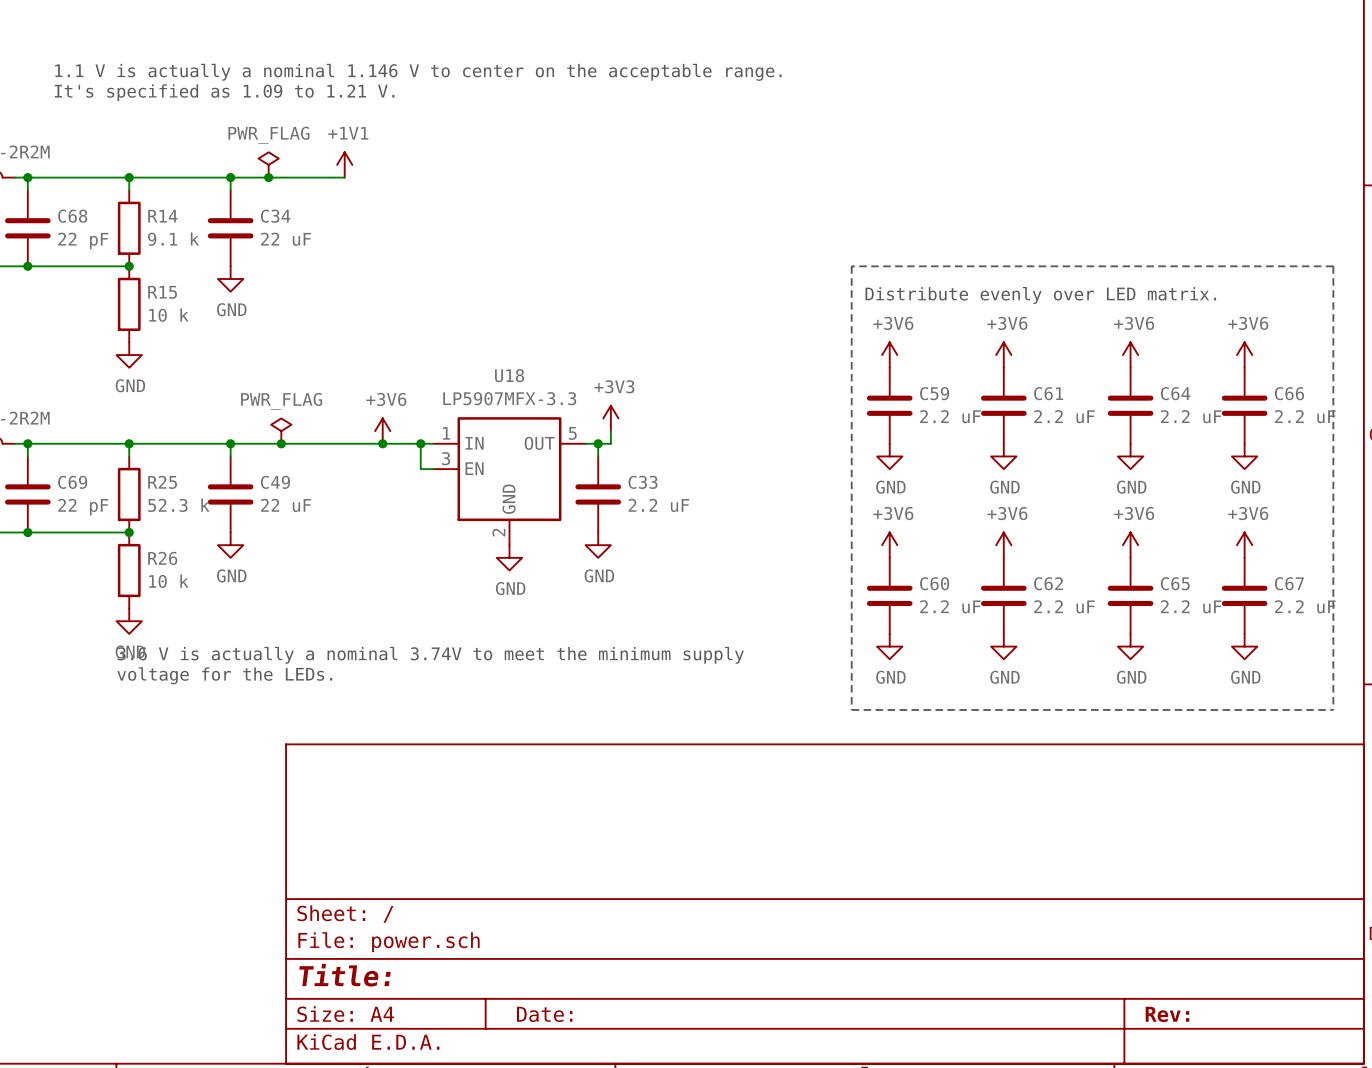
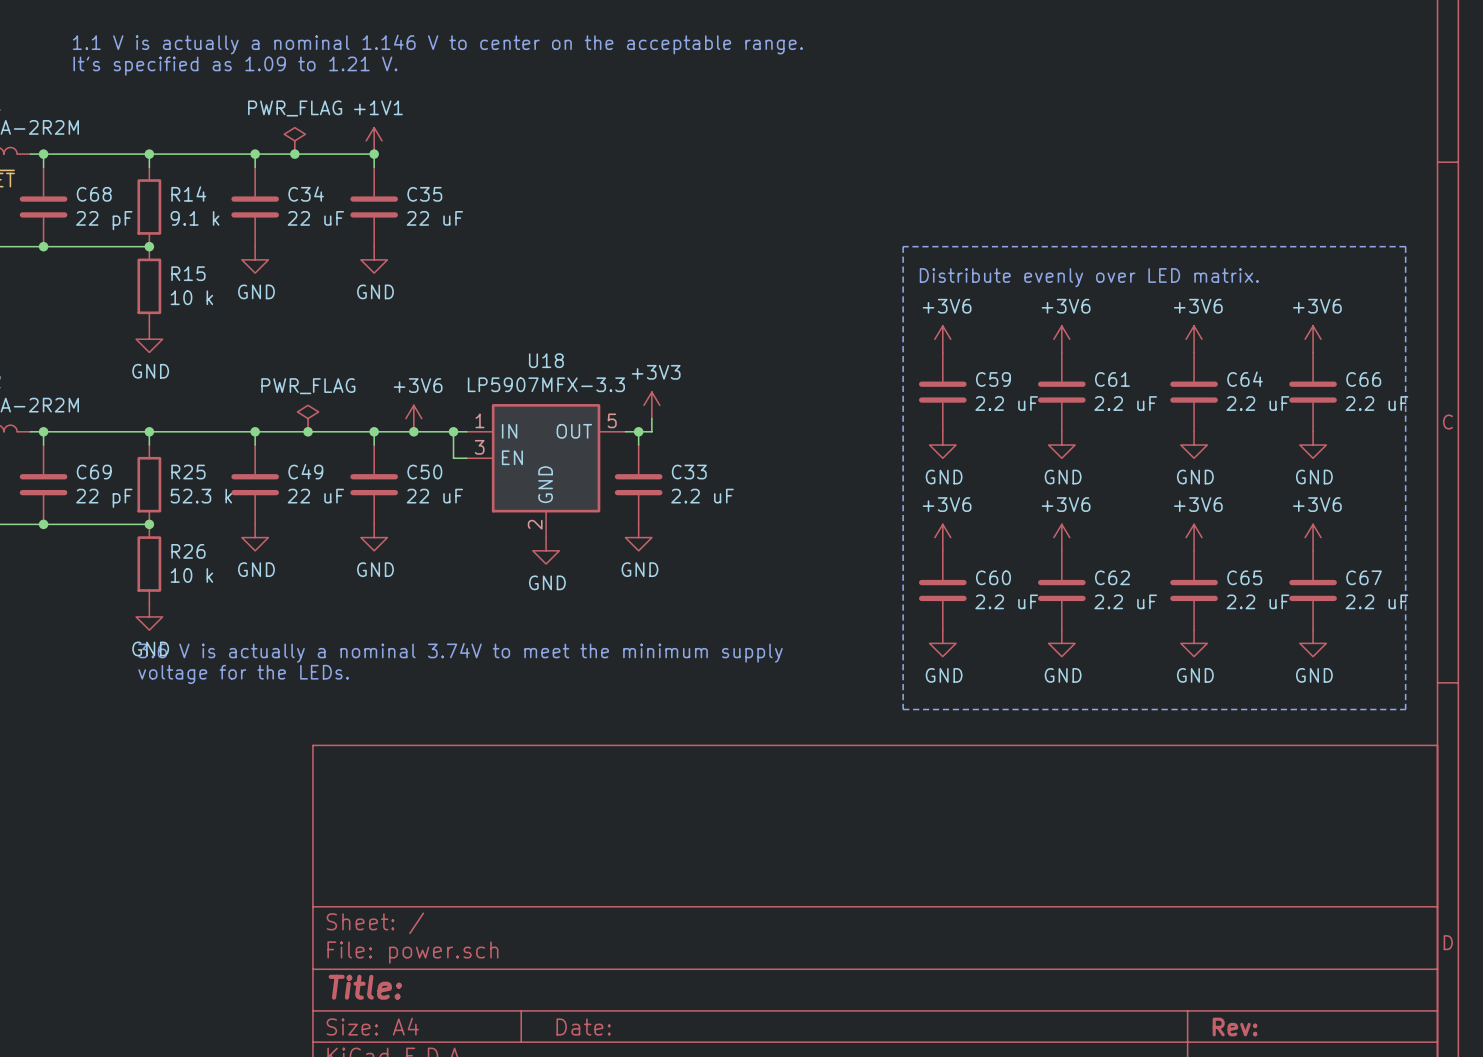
wire: none -> (374, 154) (374, 167)
junction: none -> (374, 154)
C35: none -> 22 uF (374, 206)
power symbol: none -> GND (374, 259)
wire: none -> (374, 431) (374, 445)
junction: none -> (374, 431)
C50: none -> 22 uF (374, 484)
power symbol: none -> GND (374, 537)

